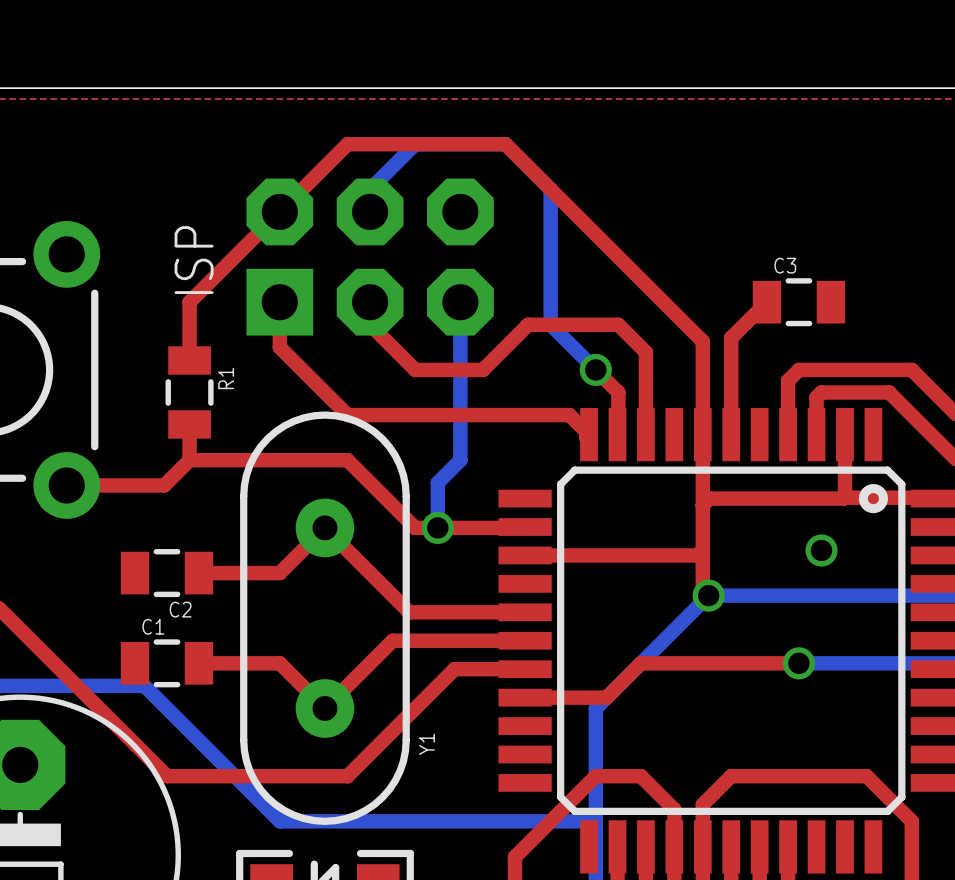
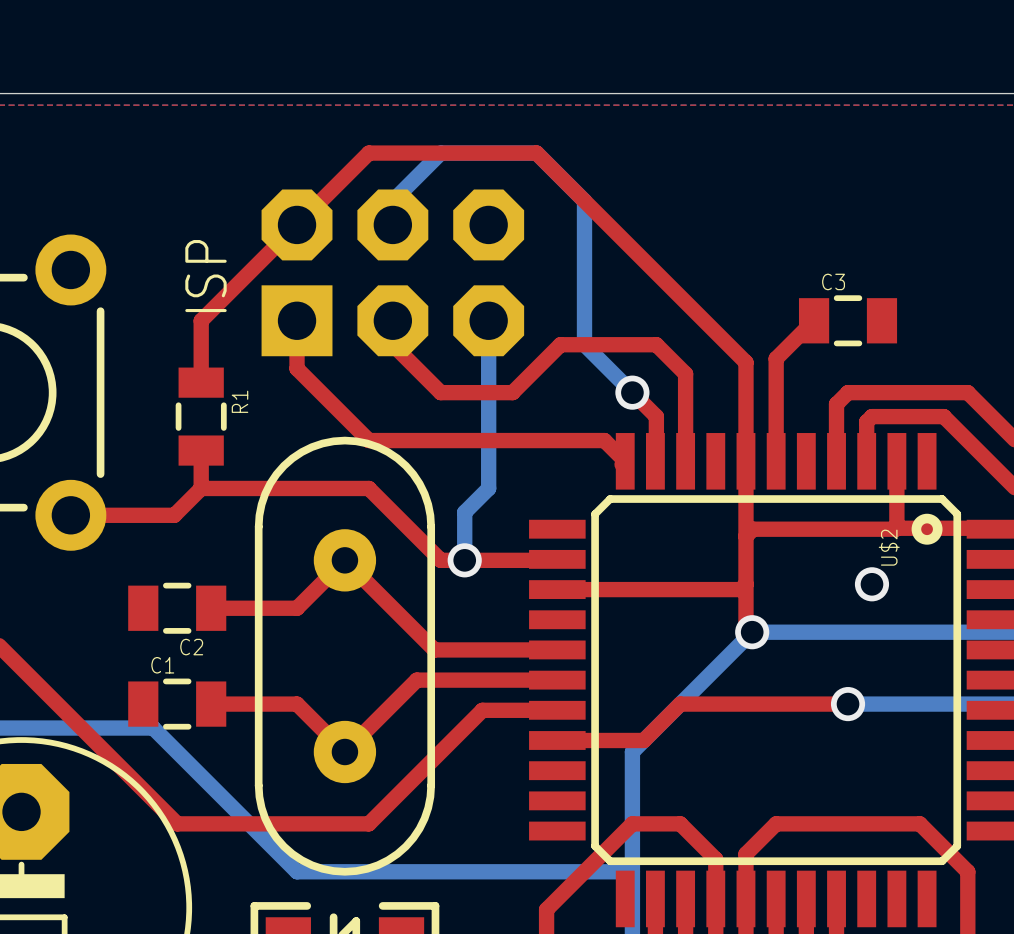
U$2 name: none -> U$2 (889, 547)
Y1 name: Y1 (426, 744) -> none

